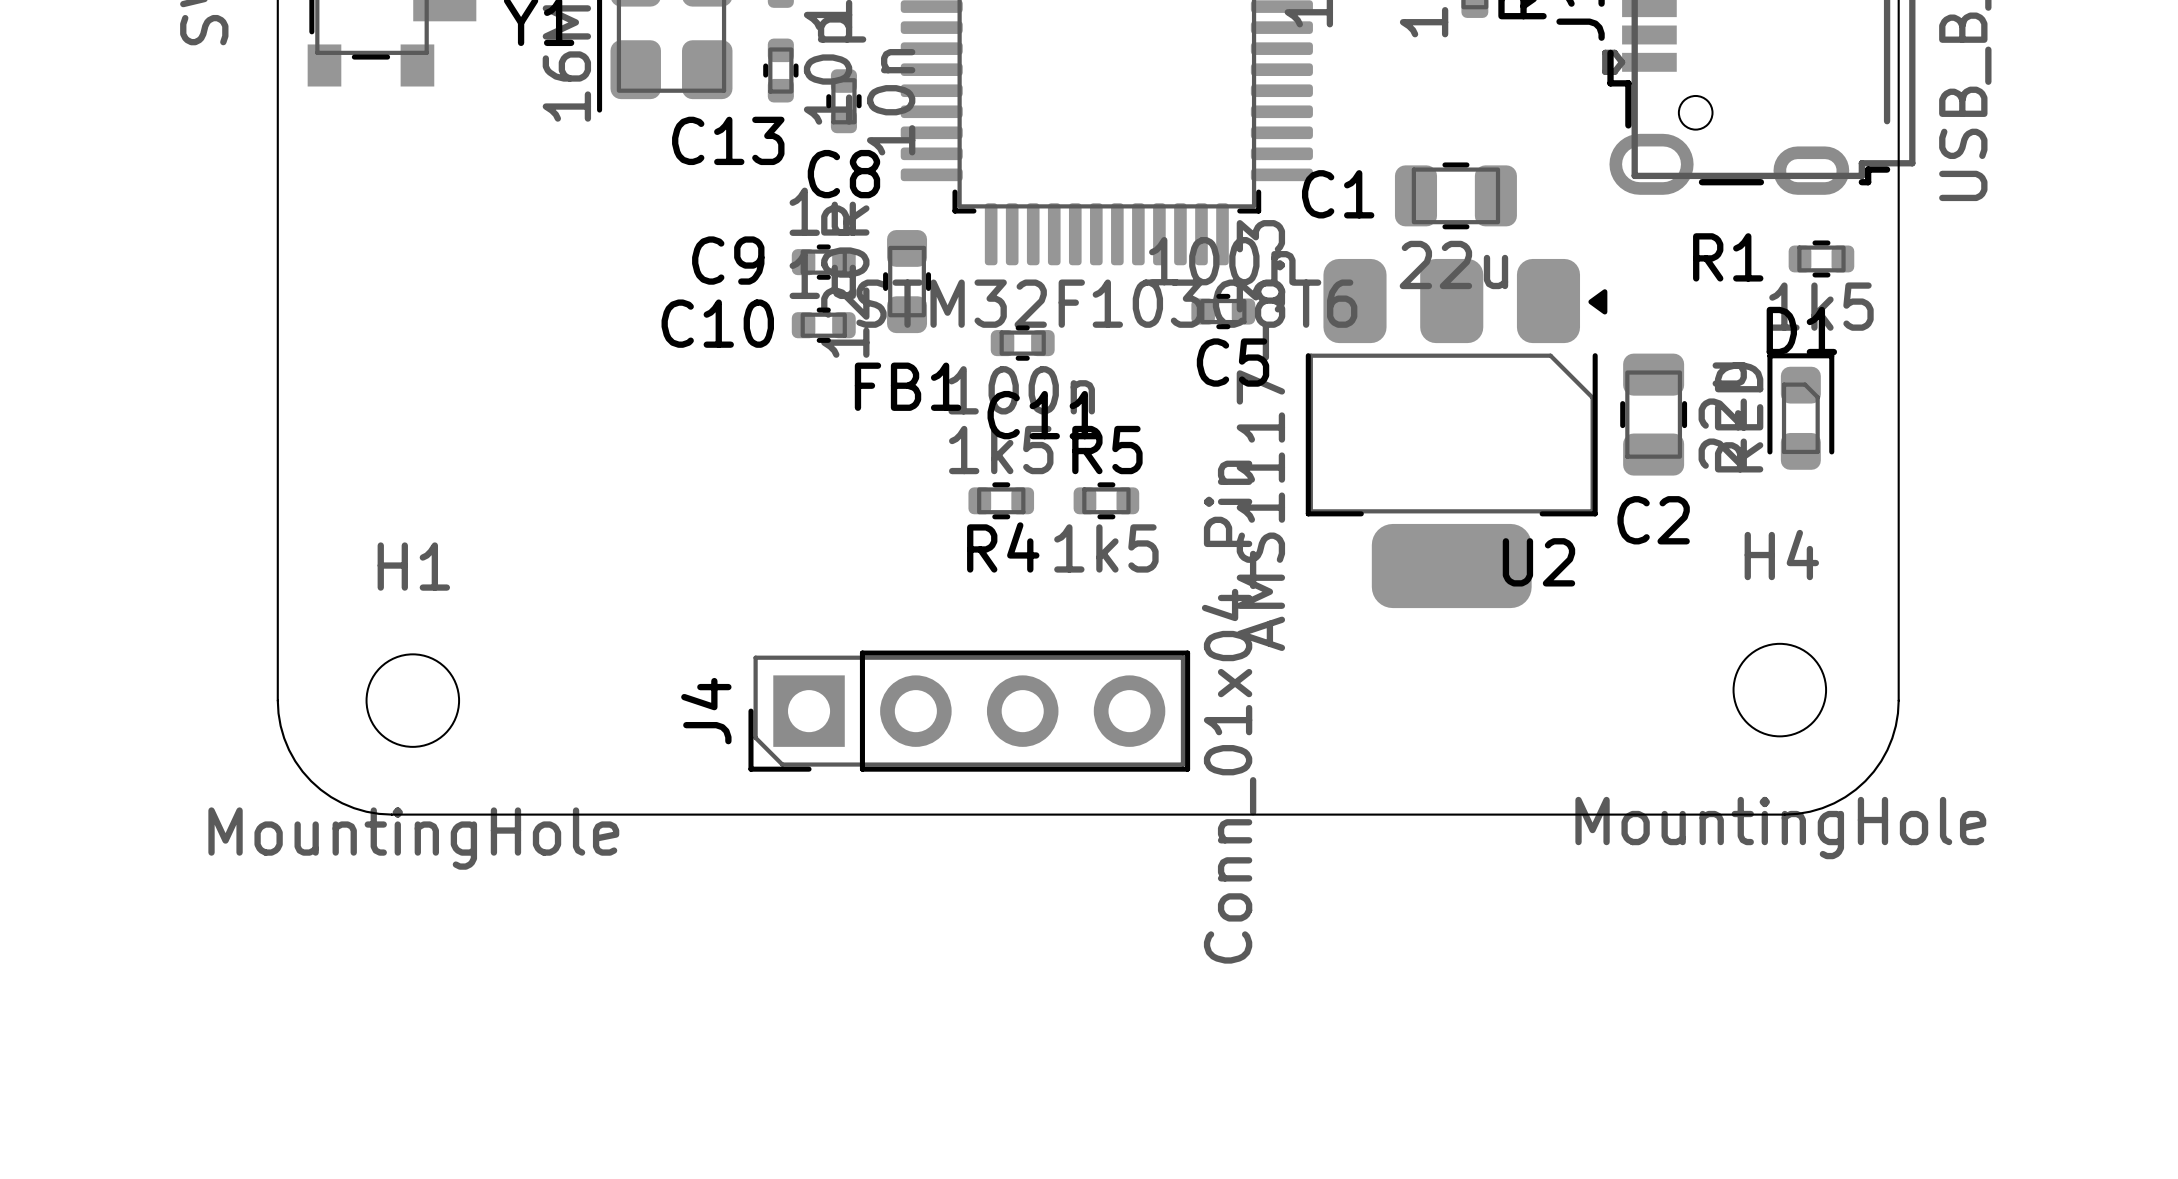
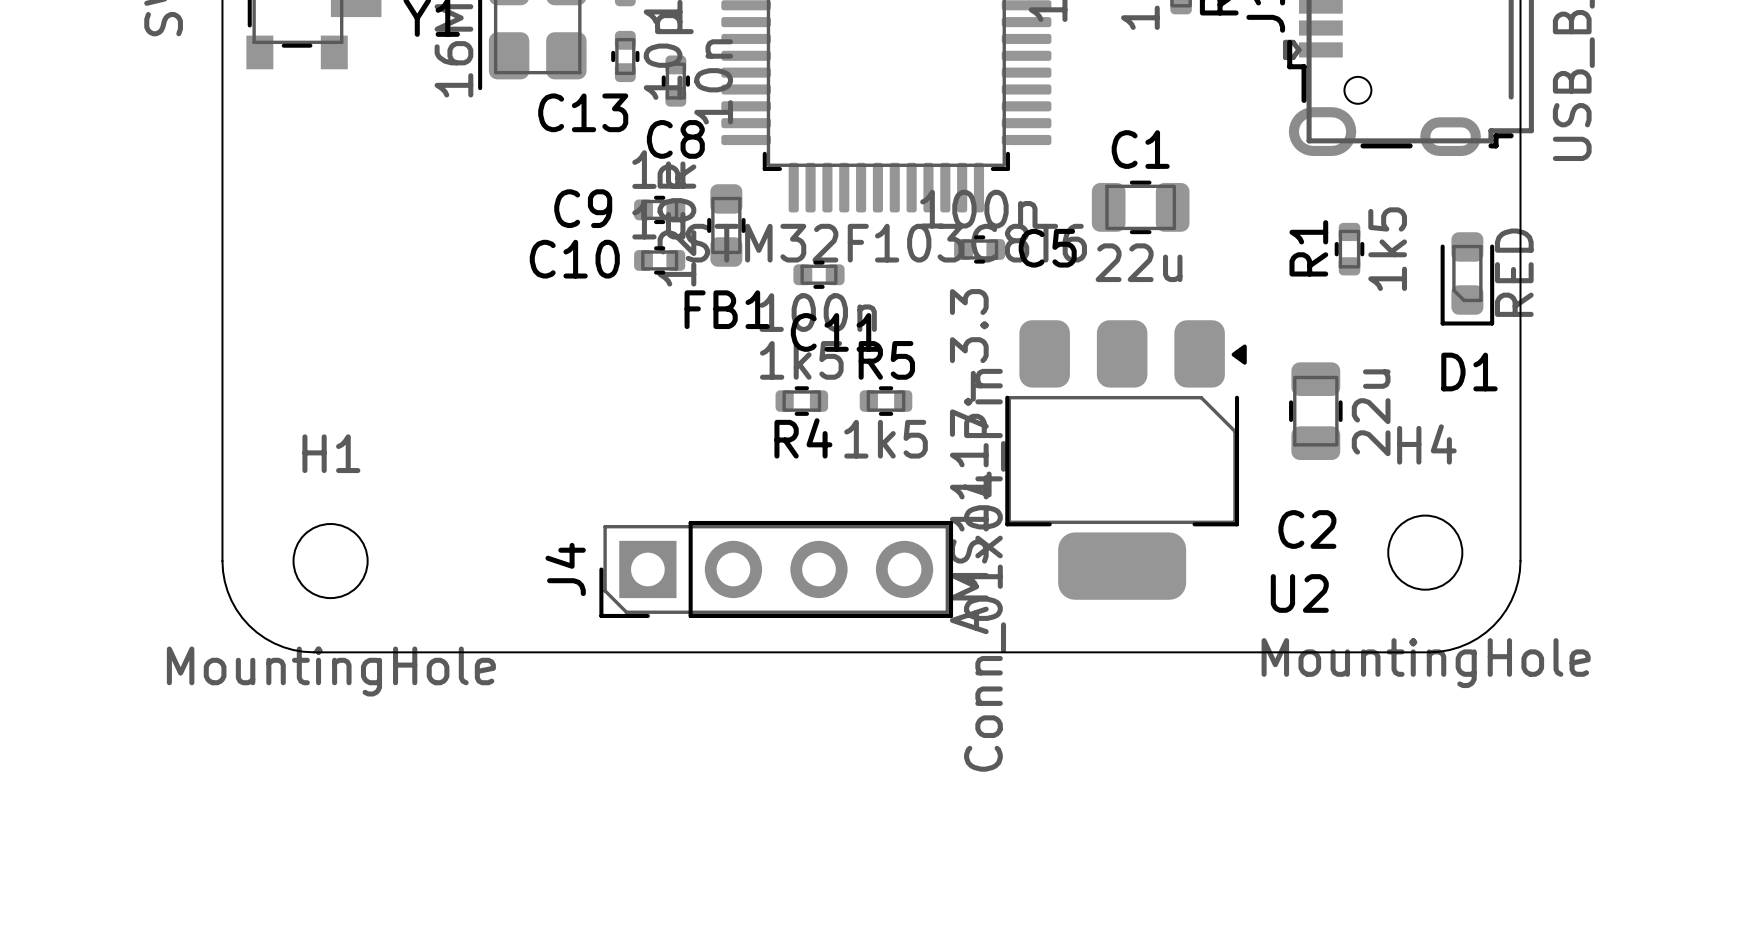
C1 name position: C1 (1338, 194) -> C1 (1140, 149)
C1 position: (1455, 195) -> (1140, 207)
R1 rotation: 0° (1821, 258) -> 90° clockwise (1349, 249)
R1 position: (1821, 258) -> (1349, 249)
C5 name position: C5 (1233, 362) -> C5 (1047, 248)
D1 rotation: 0° (1800, 411) -> 180° (1467, 278)
D1 position: (1800, 411) -> (1467, 278)
C2 position: (1653, 414) -> (1315, 411)
U2 position: (1456, 433) -> (1126, 460)
C2 name position: C2 (1653, 520) -> C2 (1307, 529)
U2 name position: U2 (1538, 562) -> U2 (1299, 593)

